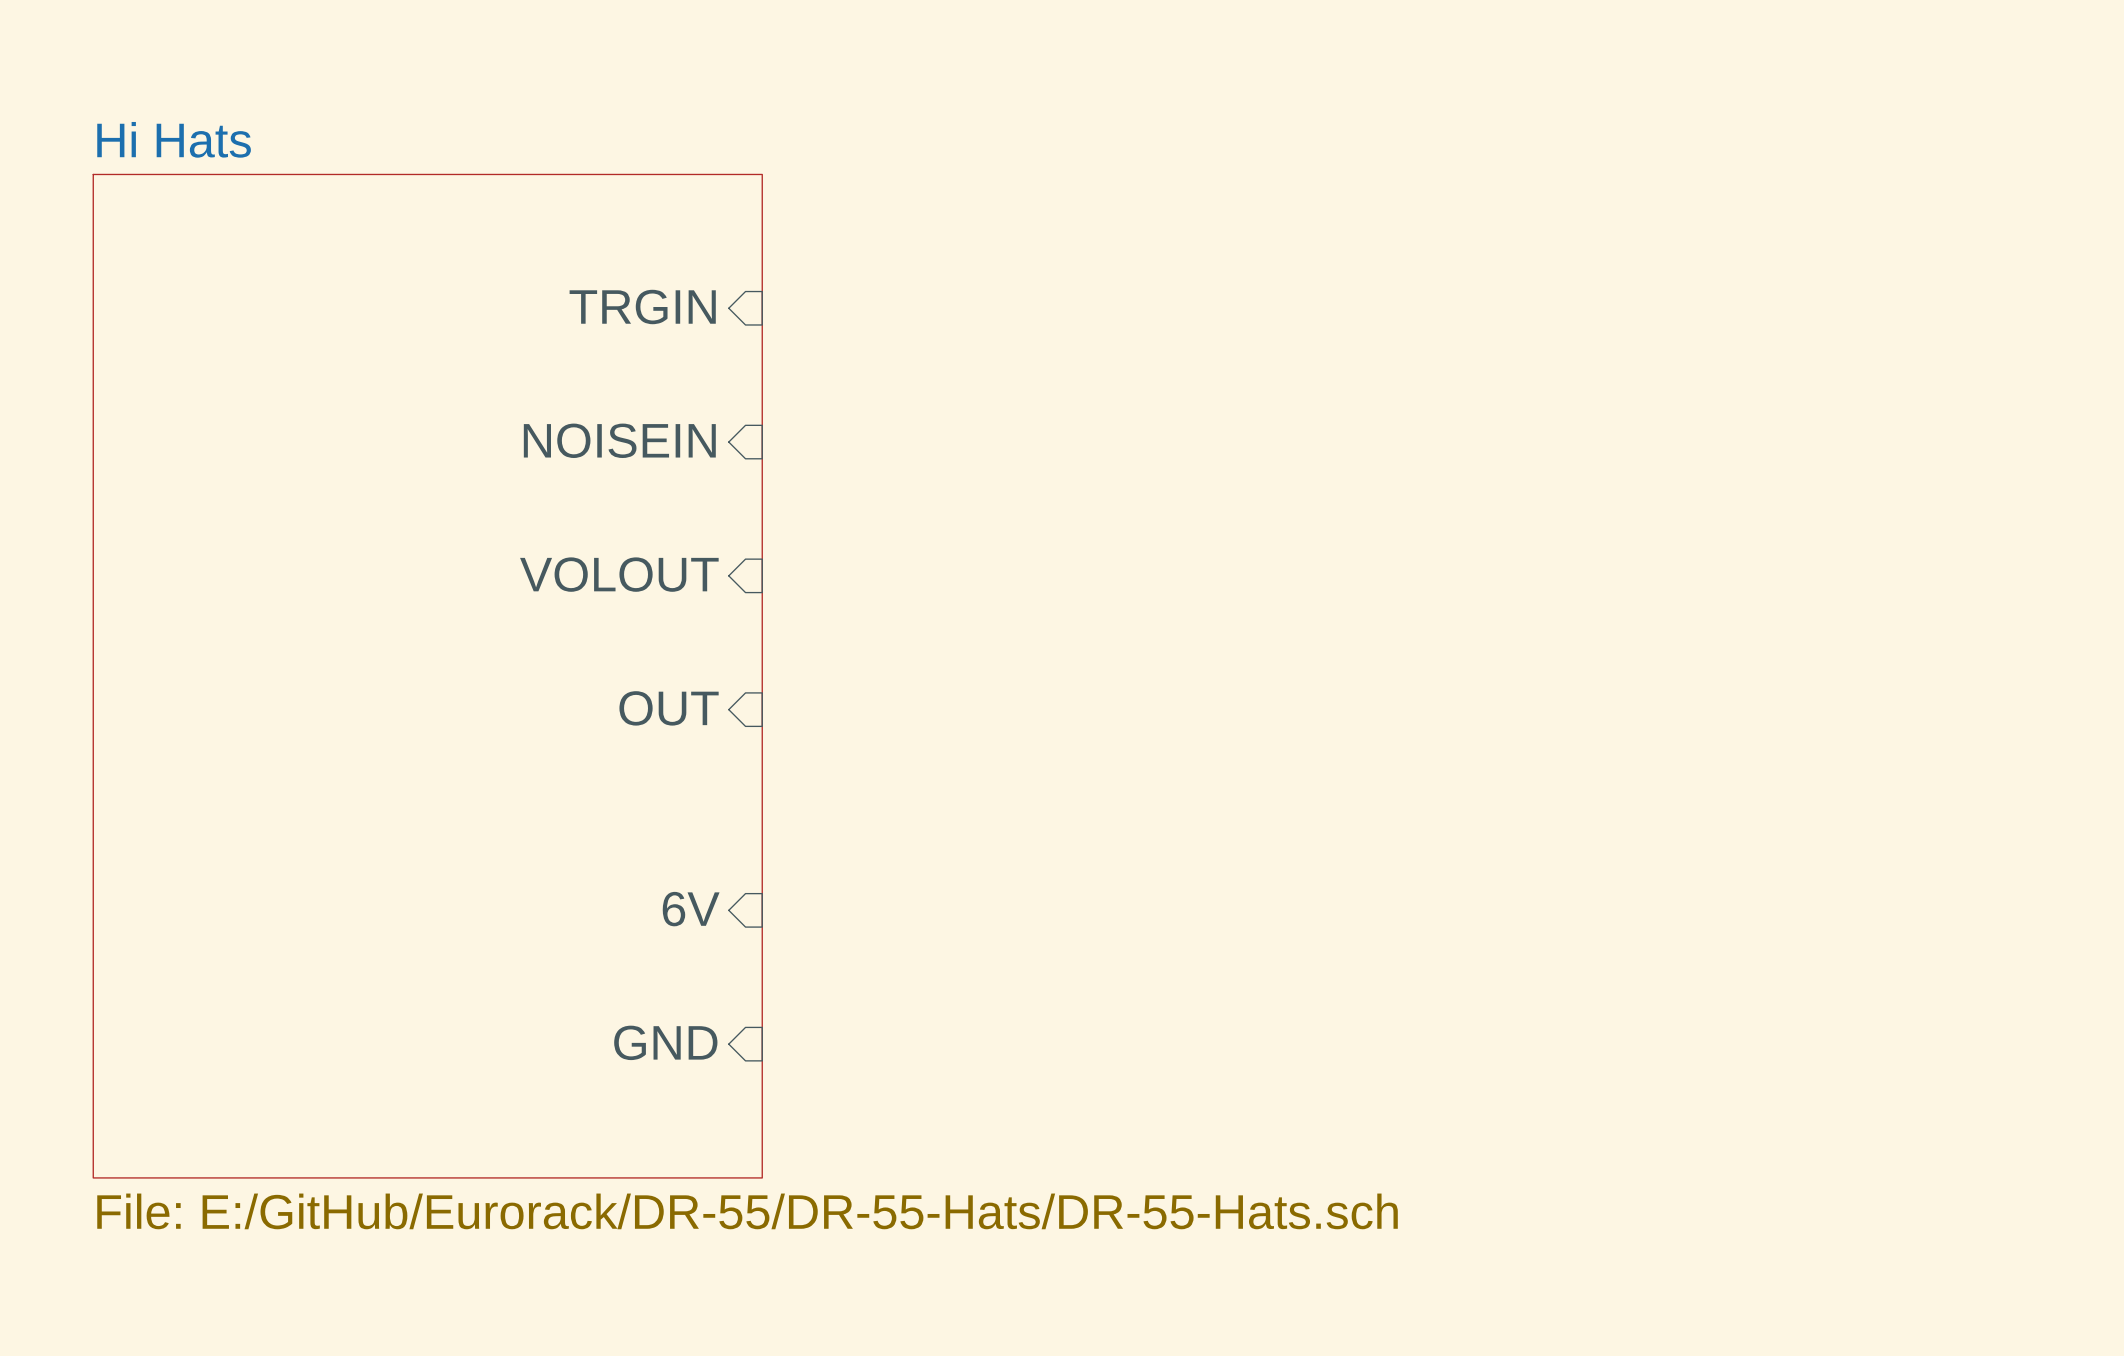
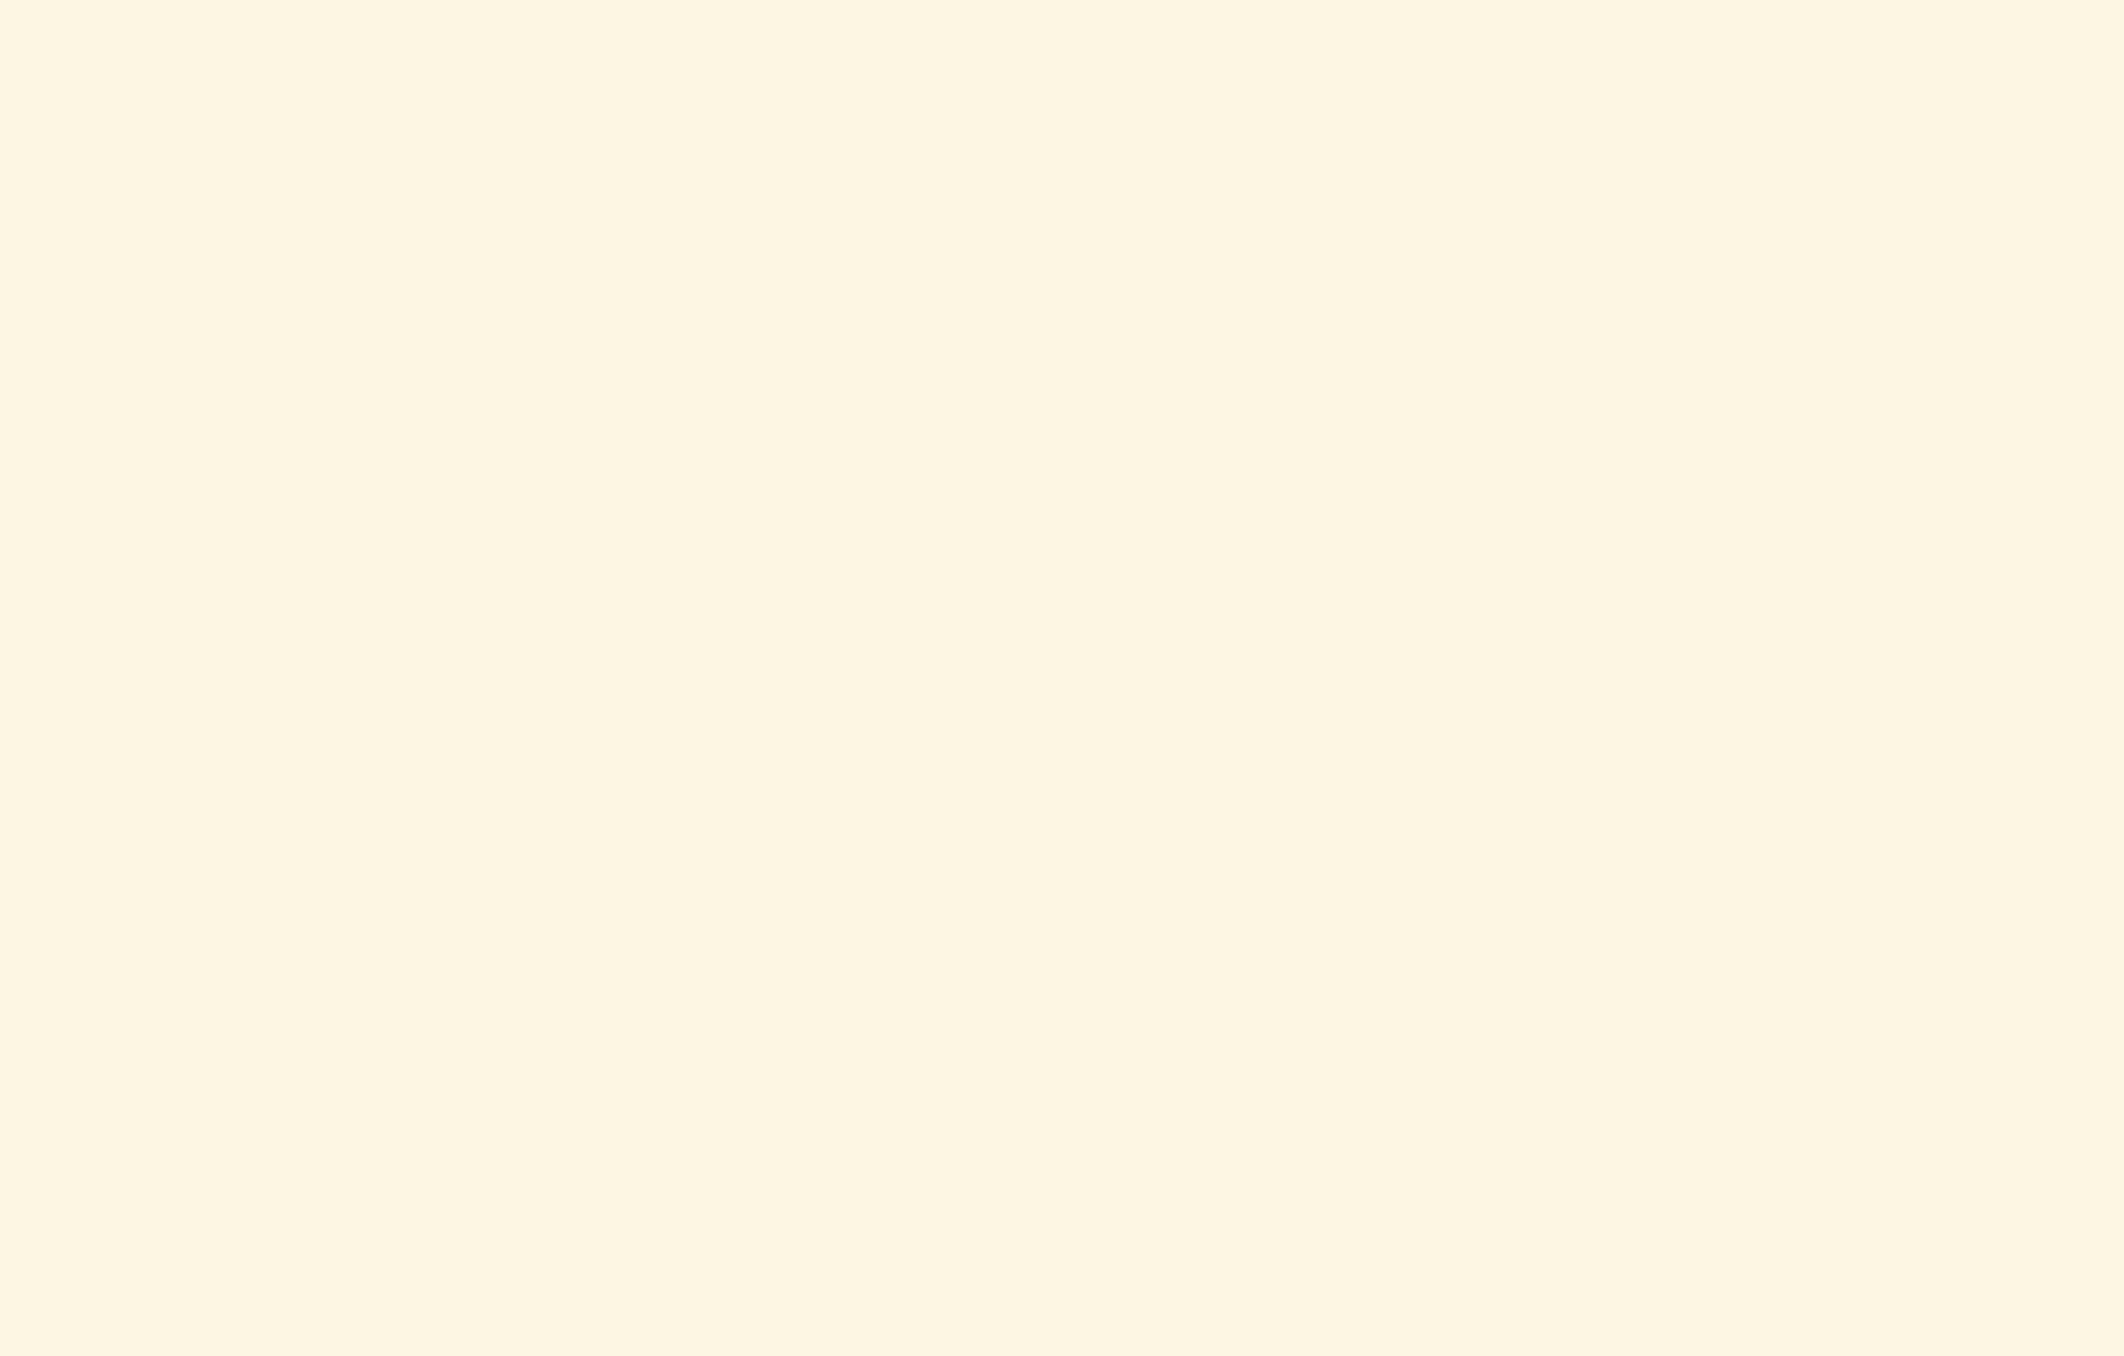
sheet pin: TRGIN (642, 307) -> none
sheet pin: NOISEIN (619, 440) -> none
sheet pin: VOLOUT (619, 574) -> none
sheet Hi Hats: File: E:/GitHub/Eurorack/DR-55/DR-55-Hats/DR-55-Hats.sch (427, 676) -> none
sheet pin: OUT (669, 708) -> none
sheet pin: 6V (691, 909) -> none
sheet pin: GND (665, 1042) -> none

